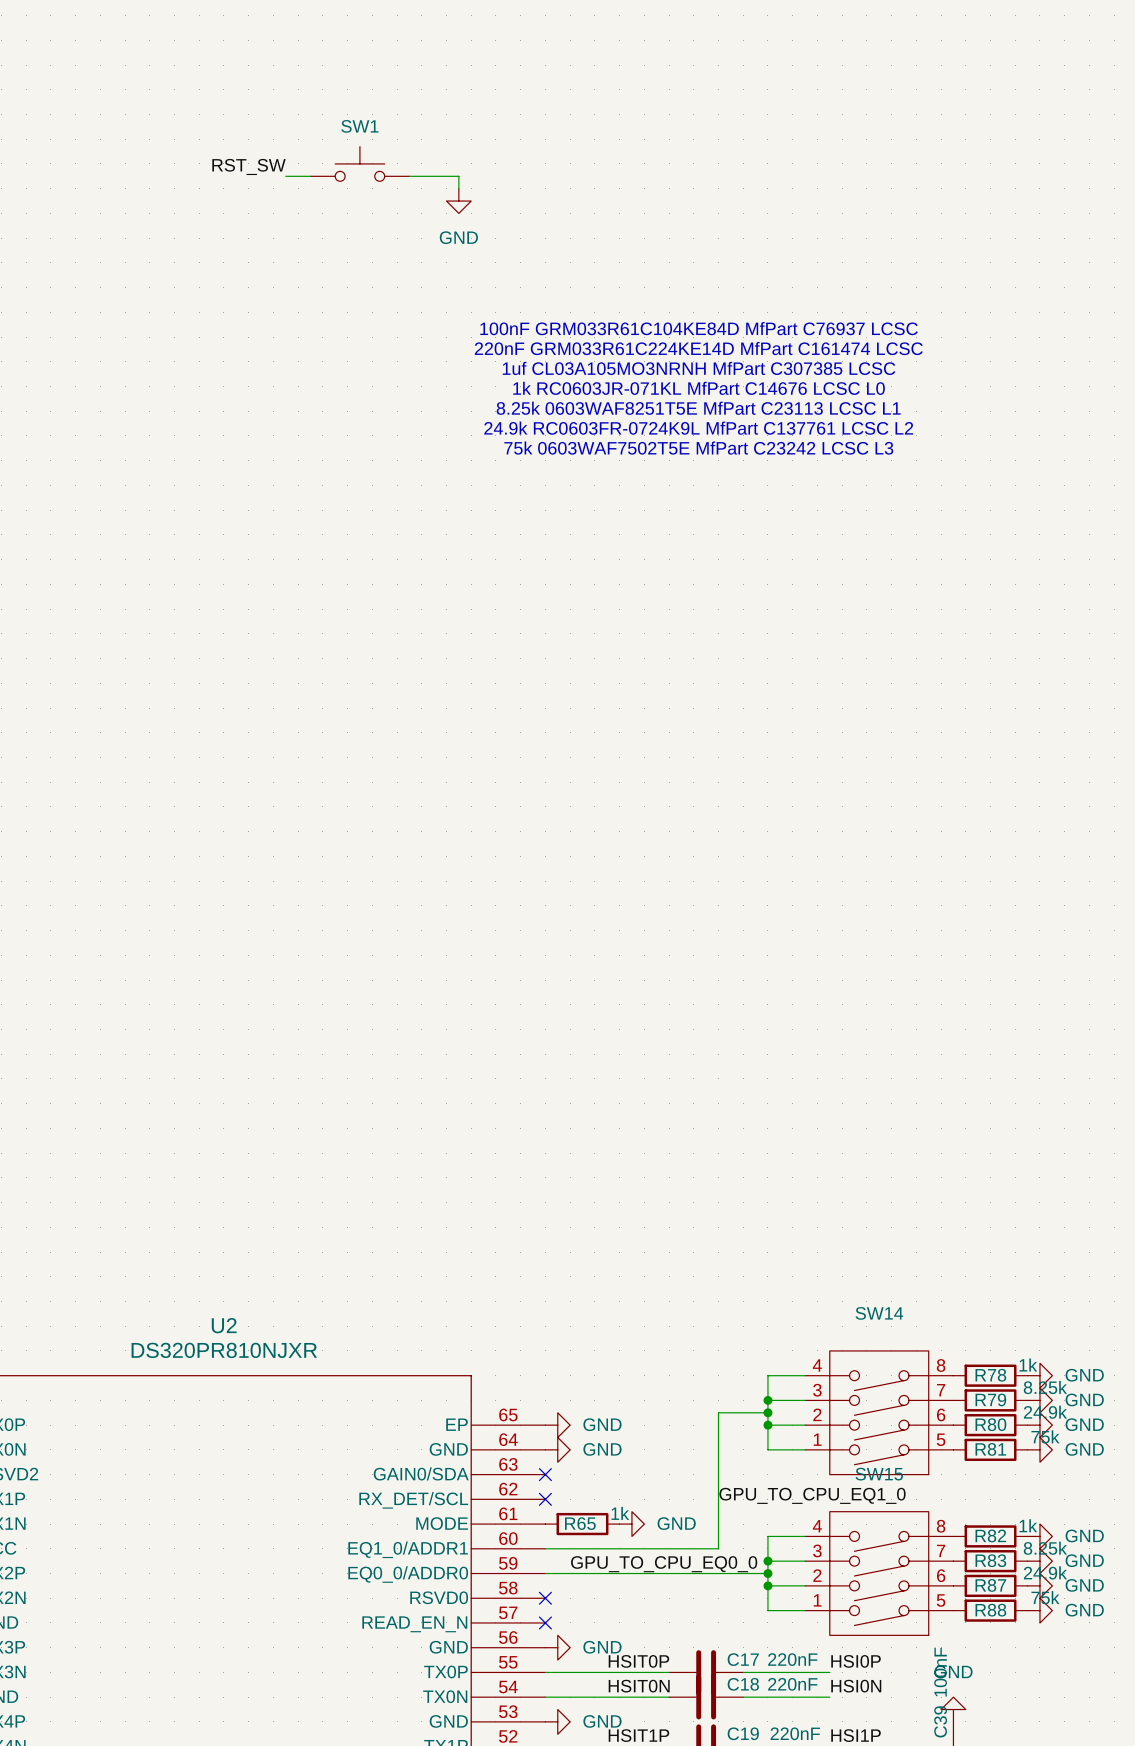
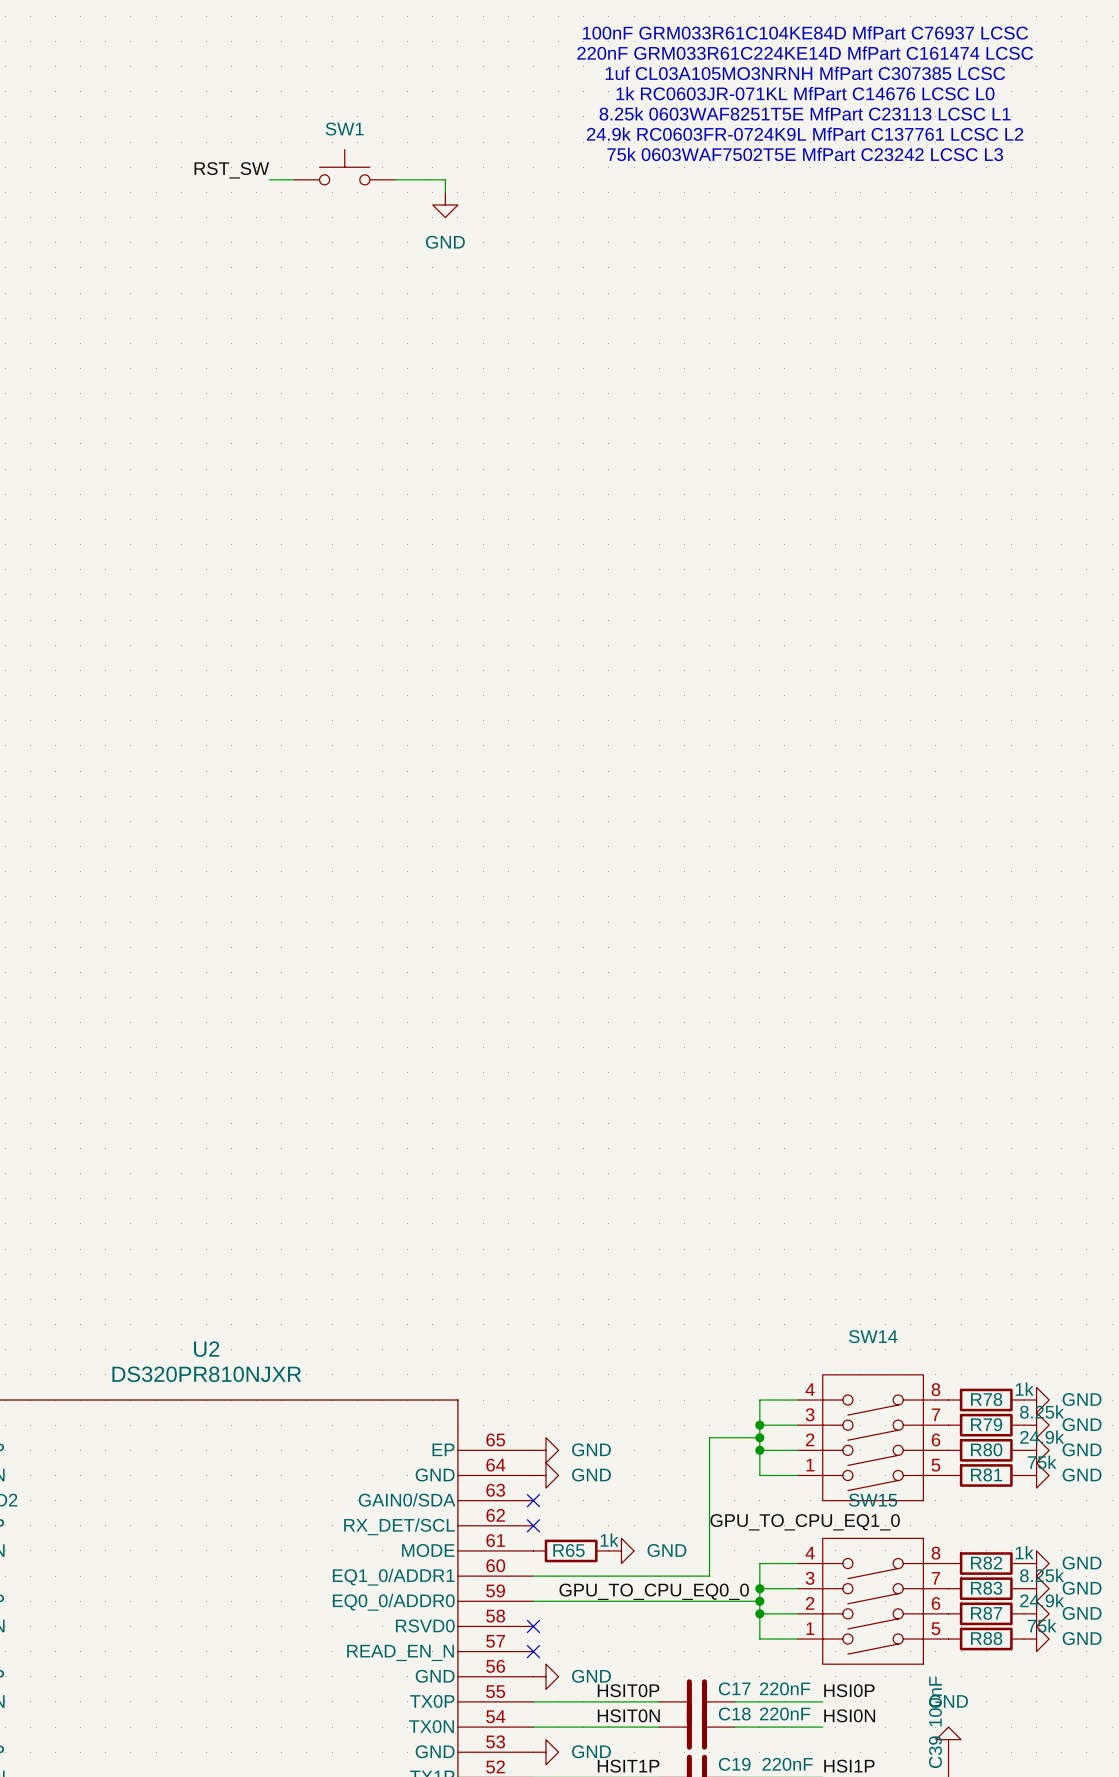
text: none -> 100nF GRM033R61C104KE84D MfPart C76937 LCSC (805, 32)
text: none -> 220nF GRM033R61C224KE14D MfPart C161474 LCSC (805, 53)
text: none -> 1uf CL03A105MO3NRNH MfPart C307385 LCSC (805, 73)
text: none -> 1k RC0603JR-071KL MfPart C14676 LCSC L0 (805, 93)
text: none -> 8.25k 0603WAF8251T5E MfPart C23113 LCSC L1 (805, 113)
text: none -> 24.9k RC0603FR-0724K9L MfPart C137761 LCSC L2 (805, 134)
text: none -> 75k 0603WAF7502T5E MfPart C23242 LCSC L3 (805, 154)
text: 100nF GRM033R61C104KE84D MfPart C76937 LCSC (699, 328) -> none
text: 220nF GRM033R61C224KE14D MfPart C161474 LCSC (698, 348) -> none
text: 1uf CL03A105MO3NRNH MfPart C307385 LCSC (699, 368) -> none
text: 1k RC0603JR-071KL MfPart C14676 LCSC L0 (699, 388) -> none
text: 8.25k 0603WAF8251T5E MfPart C23113 LCSC L1 (698, 408) -> none
text: 24.9k RC0603FR-0724K9L MfPart C137761 LCSC L2 (698, 428) -> none
text: 75k 0603WAF7502T5E MfPart C23242 LCSC L3 (698, 448) -> none

